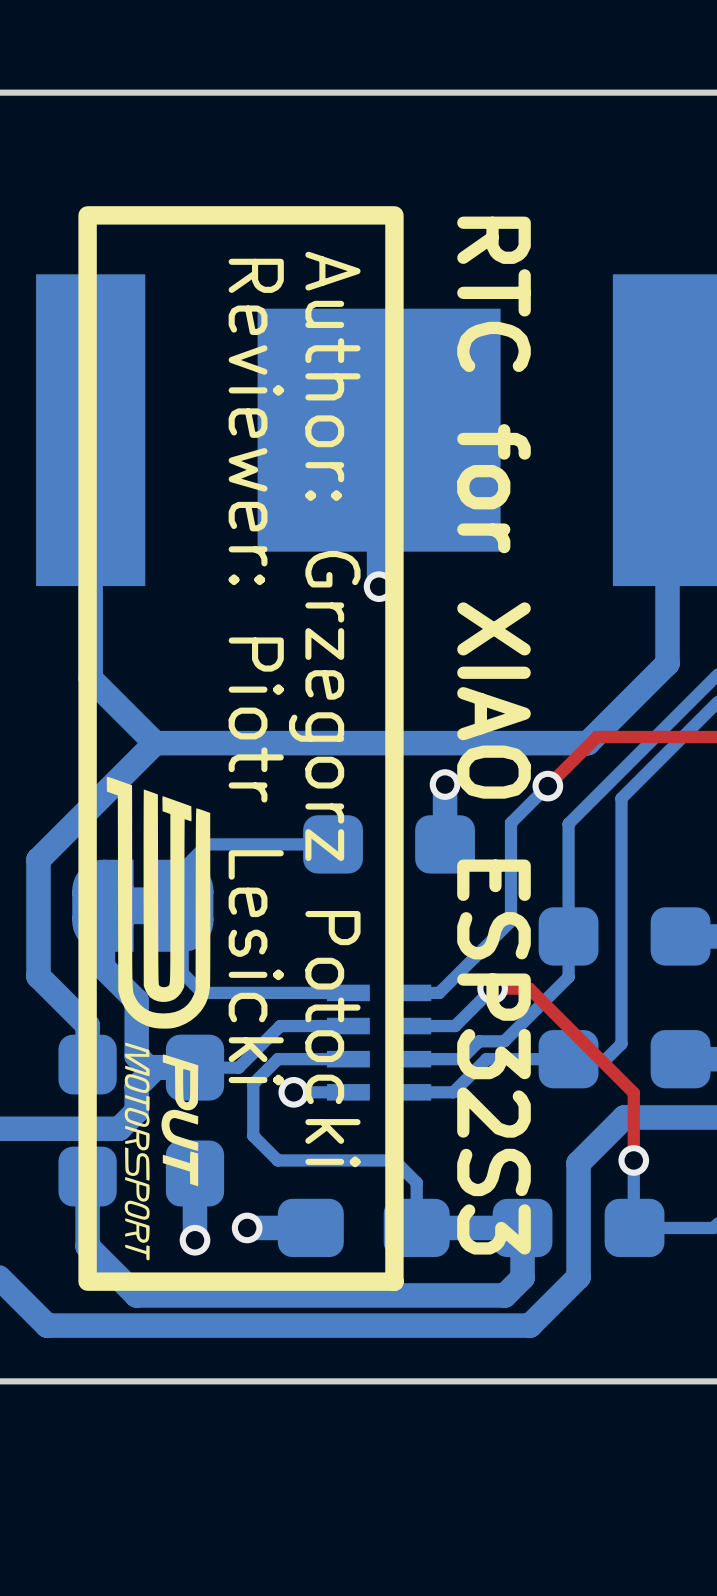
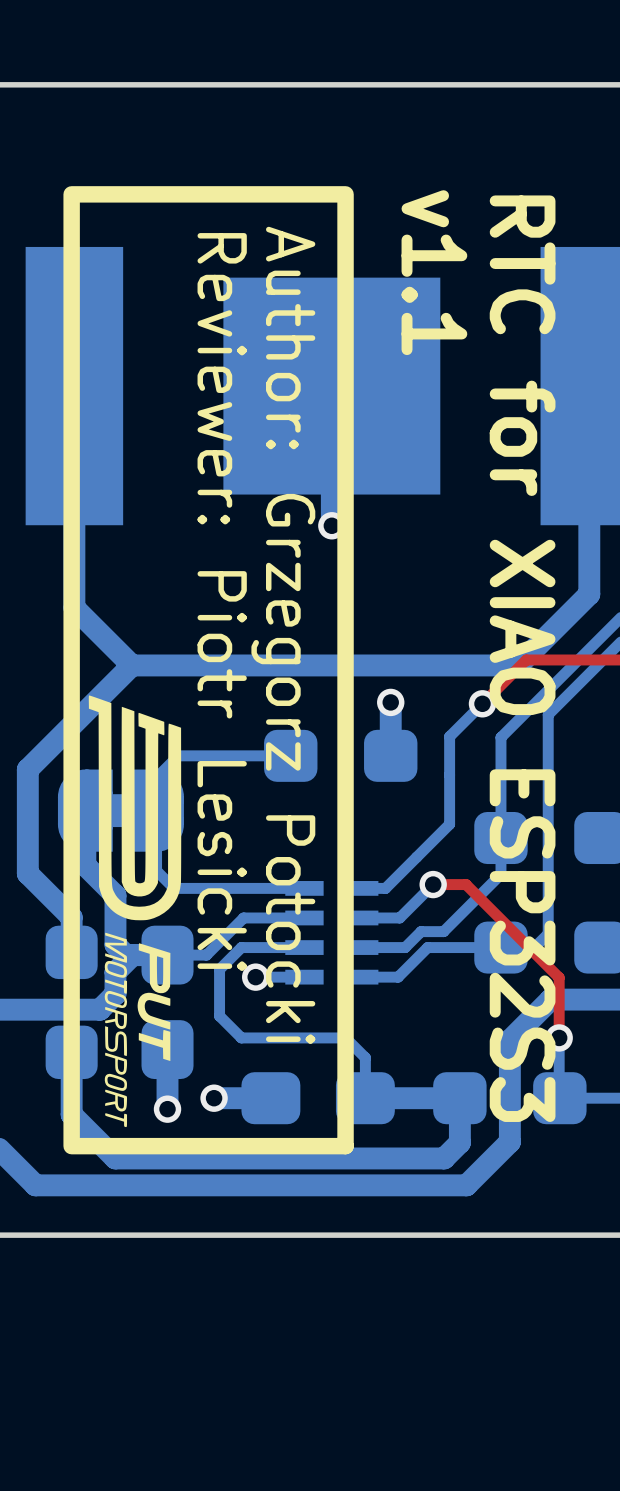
text: RTC for XIAO ESP32S3 (494, 735) -> v1.1 (434, 272)
text: none -> RTC for XIAO ESP32S3 (522, 658)

